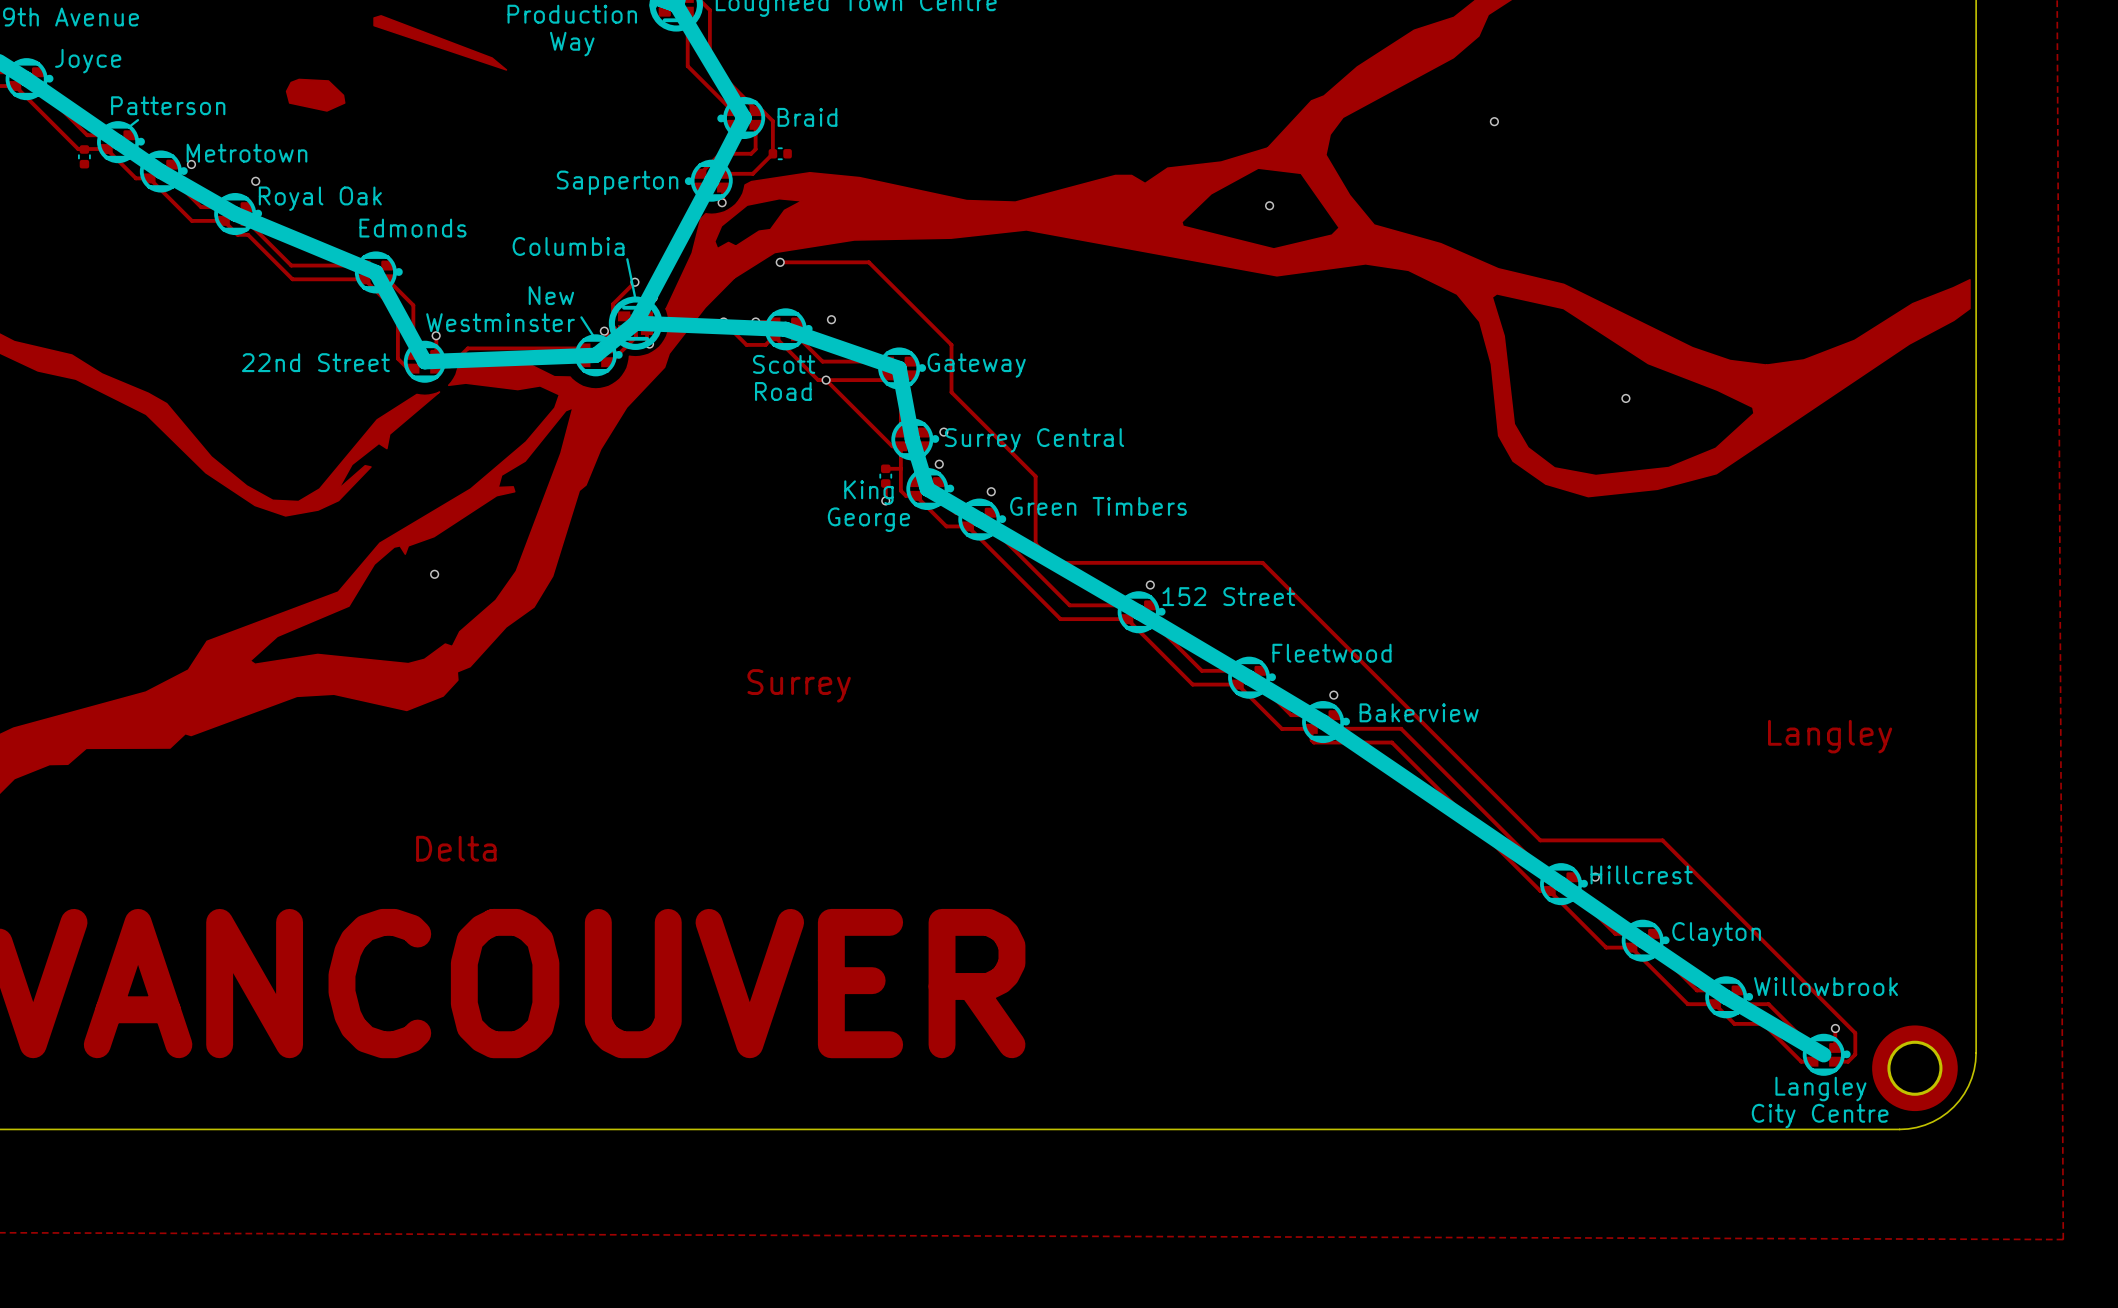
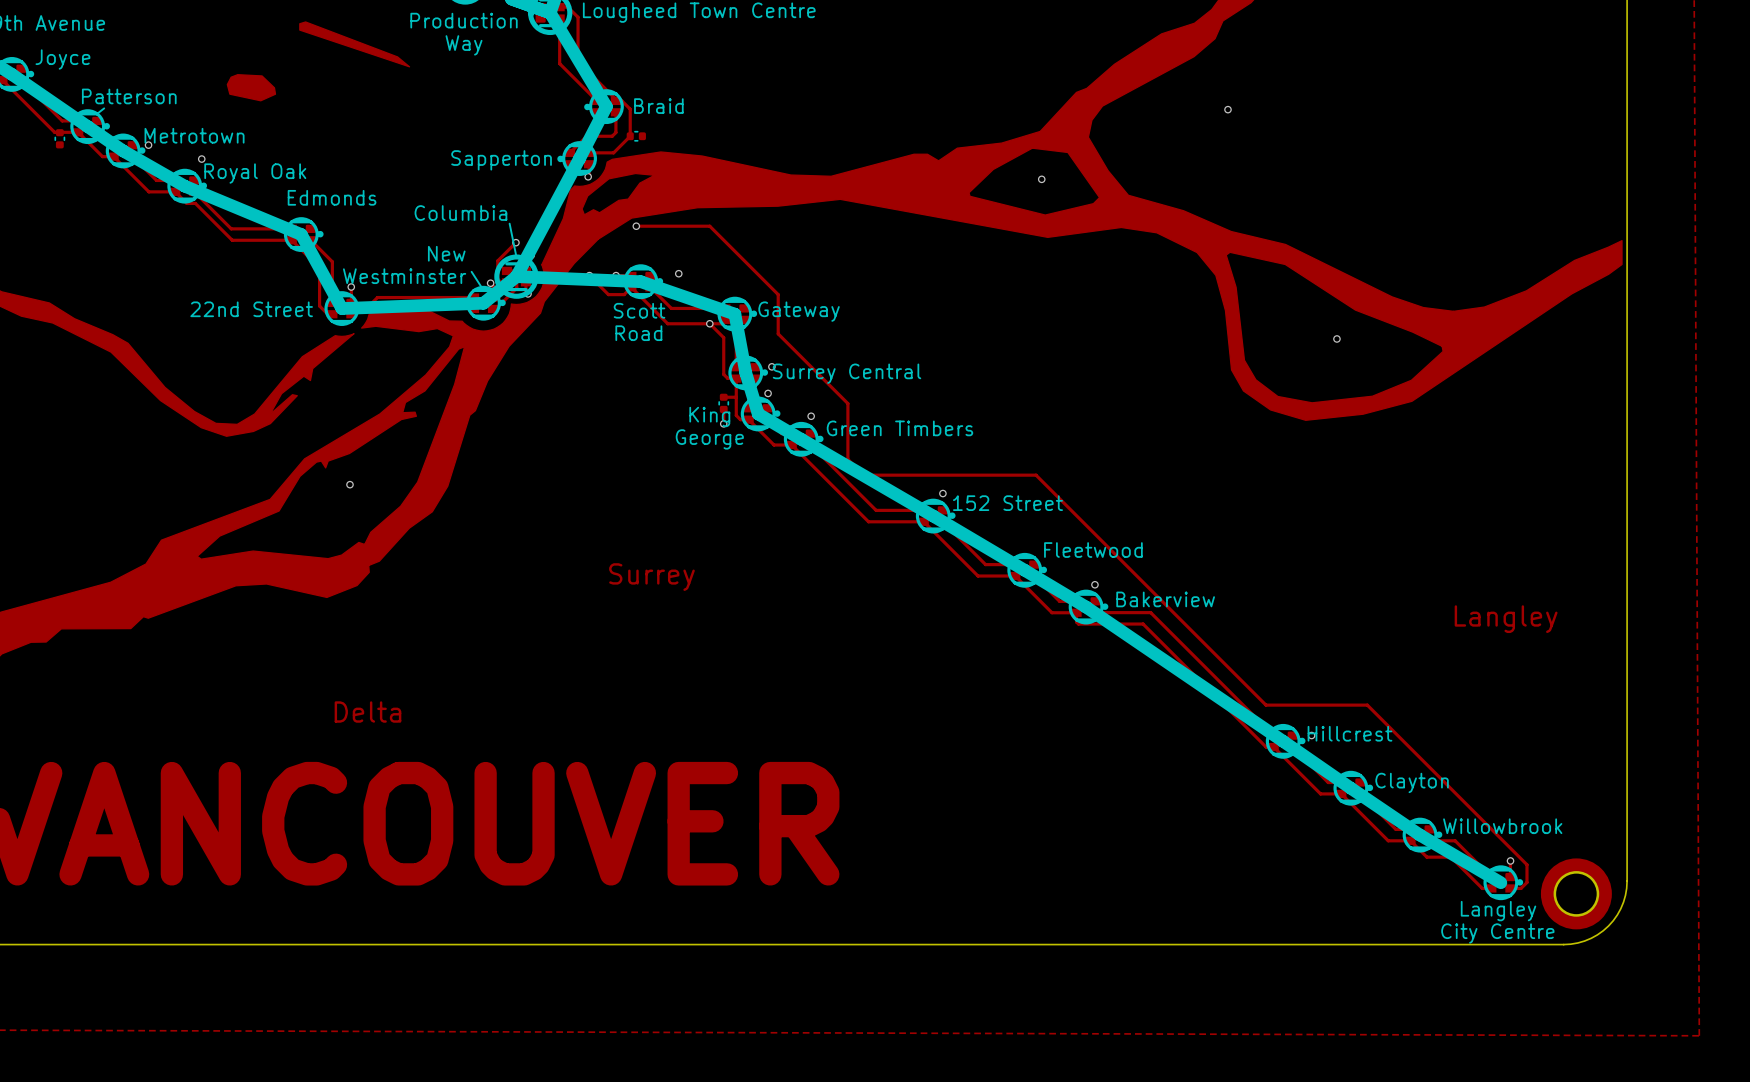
track: (826, 380) (892, 446) (900, 446) -> (709, 323) (723, 337) (723, 374) (727, 378) (736, 378)
via position: (826, 380) -> (709, 323)

